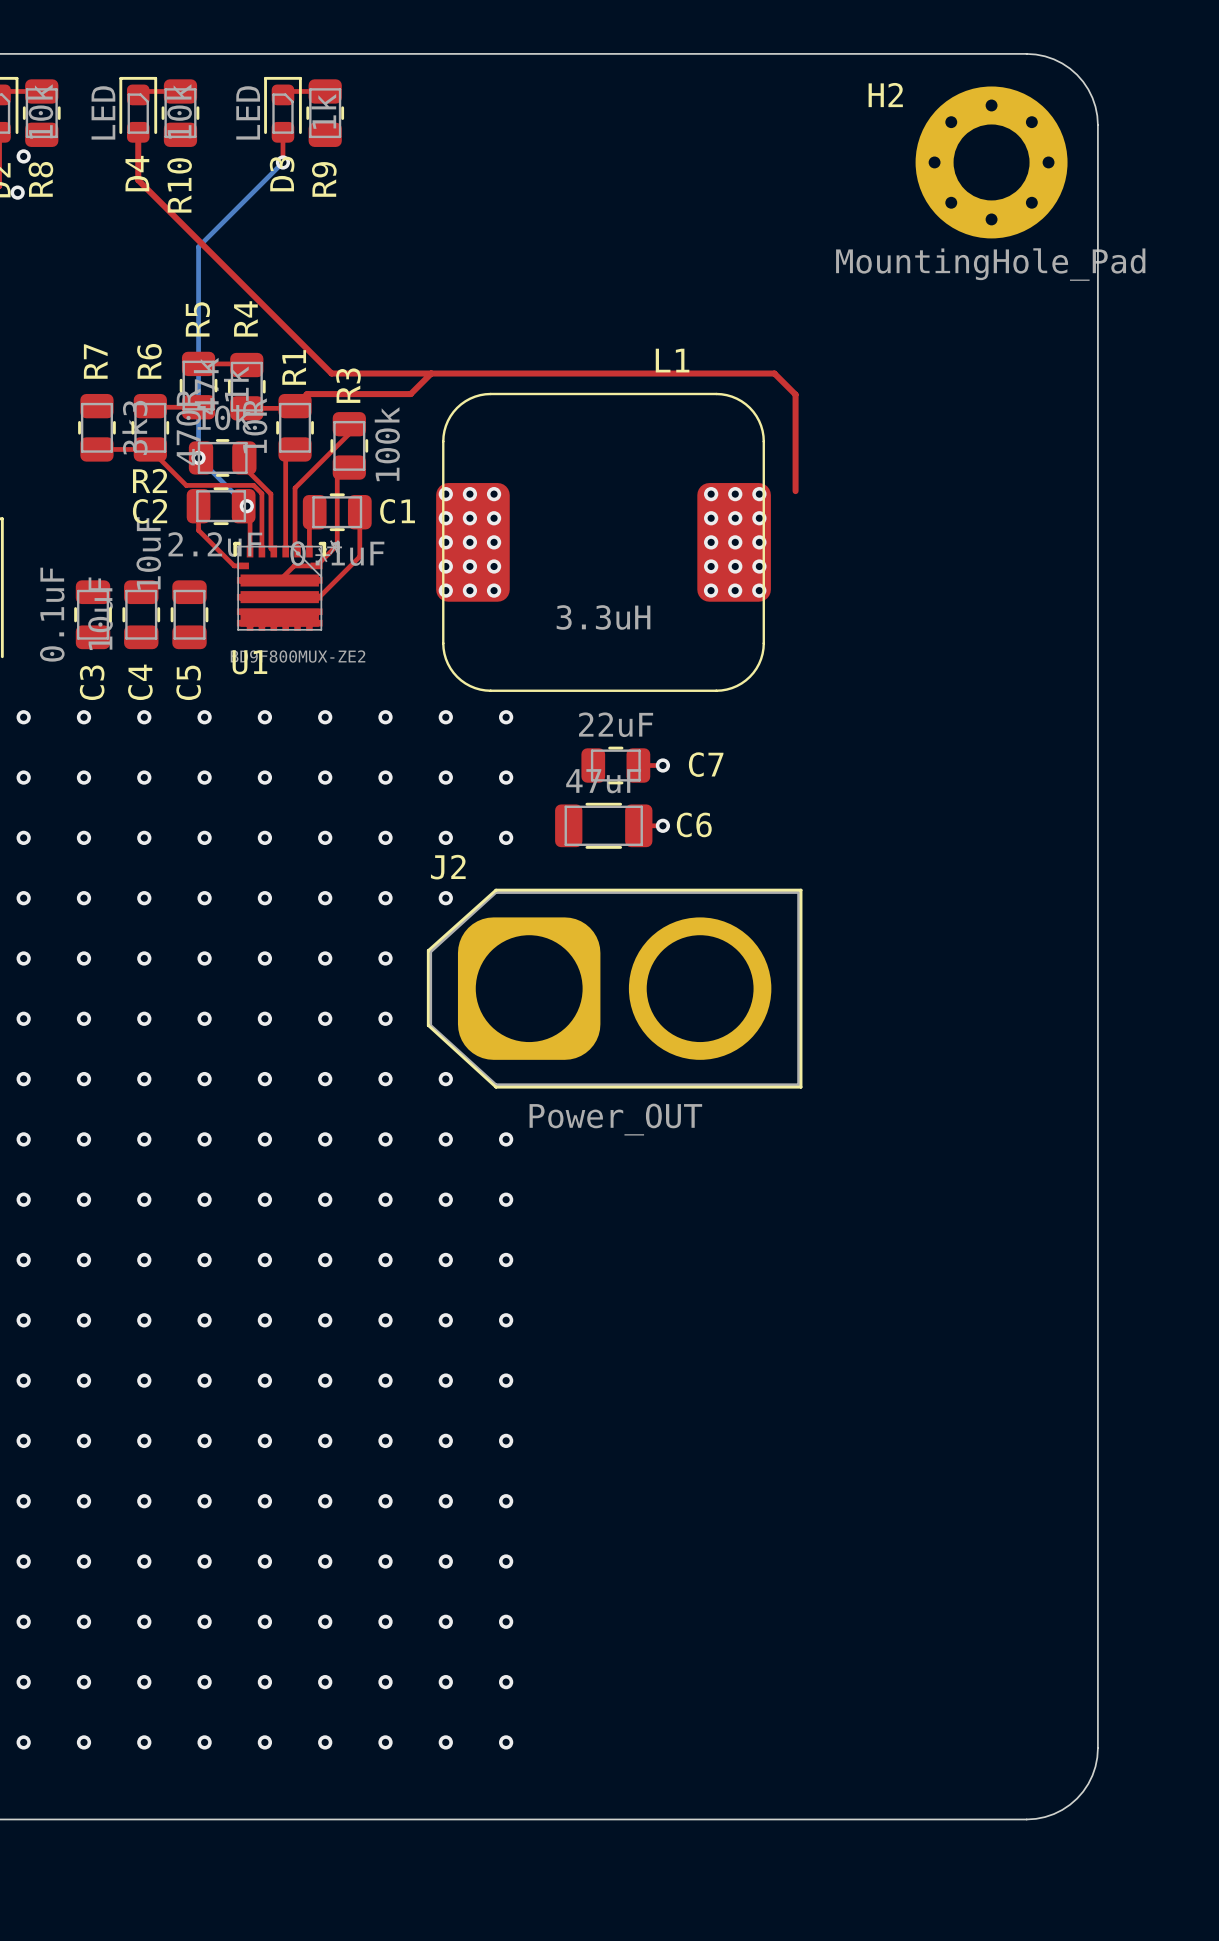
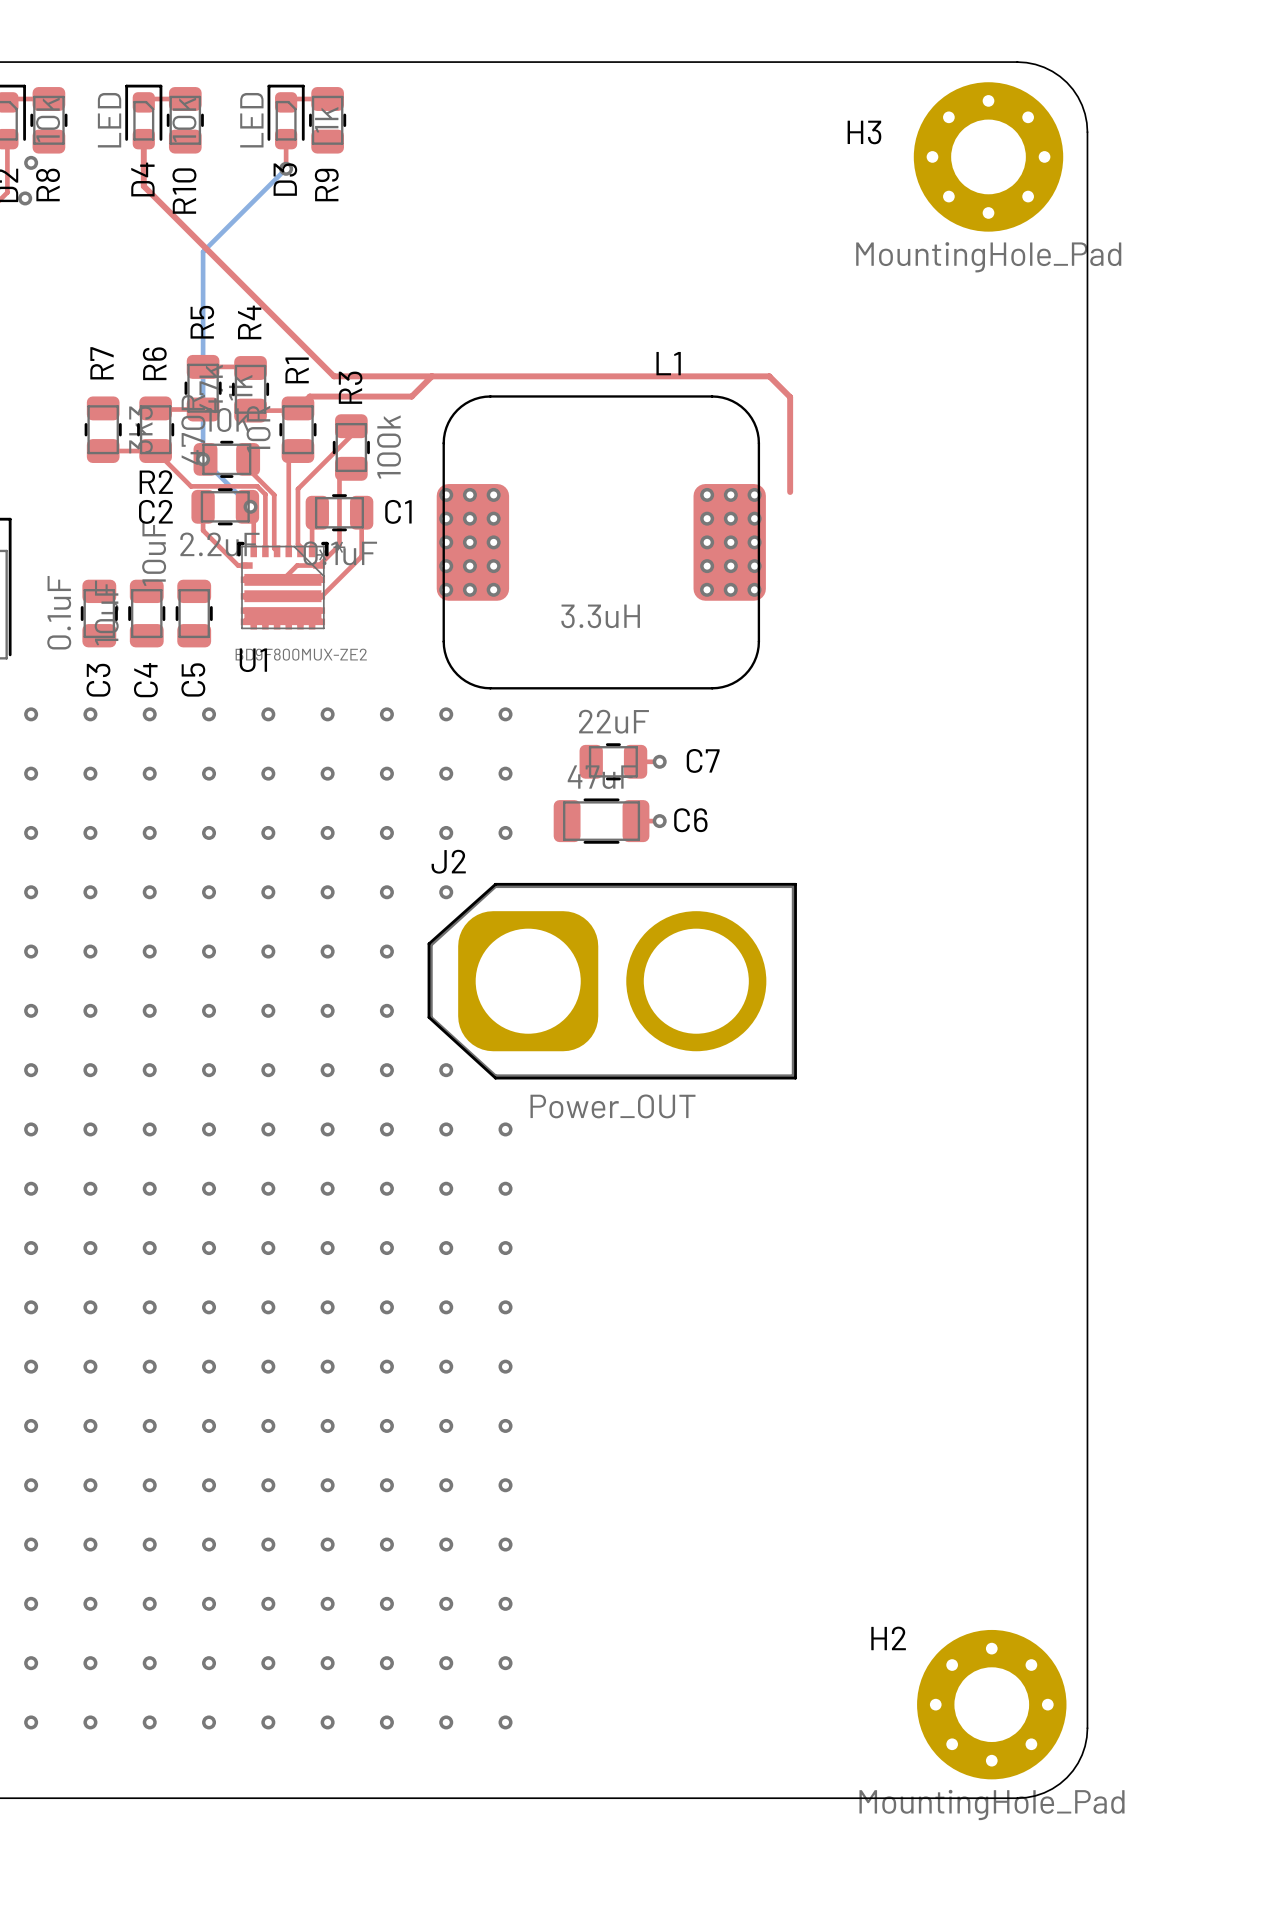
H3: none -> MountingHole_Pad (988, 156)
H2 position: (991, 162) -> (991, 1704)

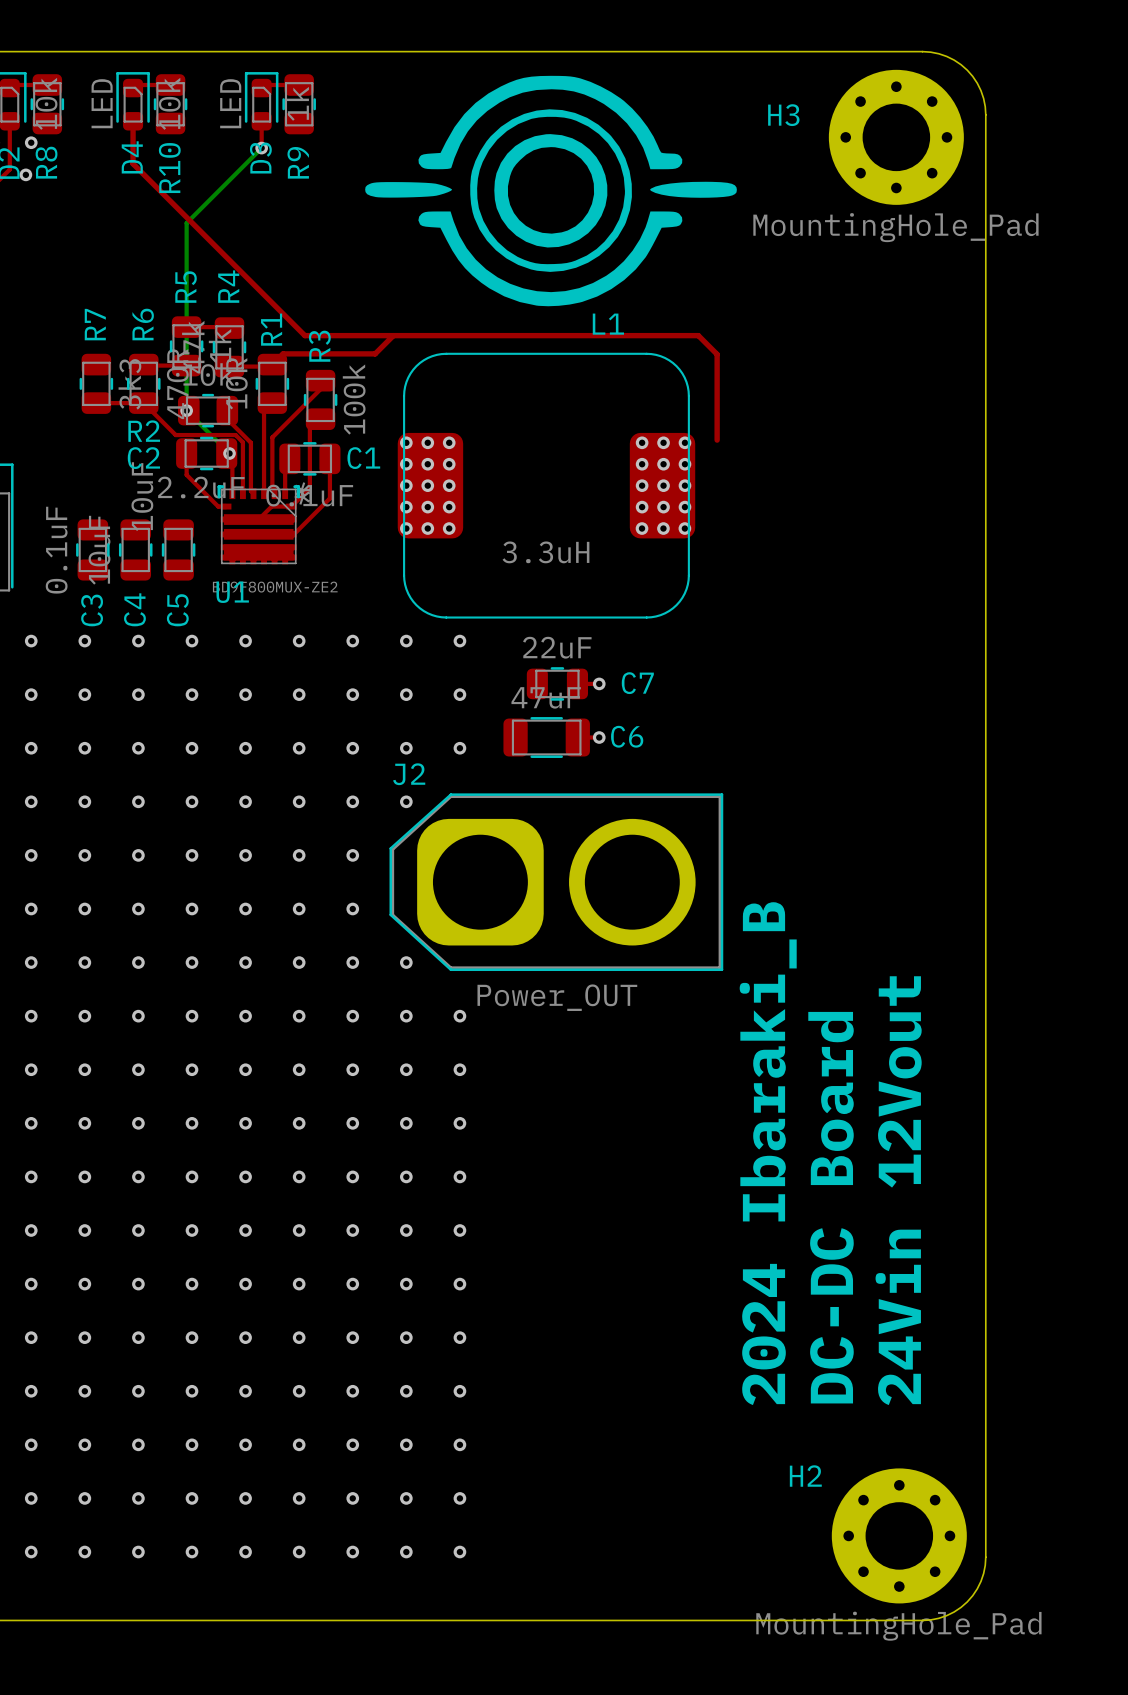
drawing: none -> [365, 75, 737, 307]
text: none -> 2024 Ibaraki_B (768, 1153)
text: none -> 24Vin 12Vout (898, 1190)
text: none -> DC-DC Board (831, 1207)

